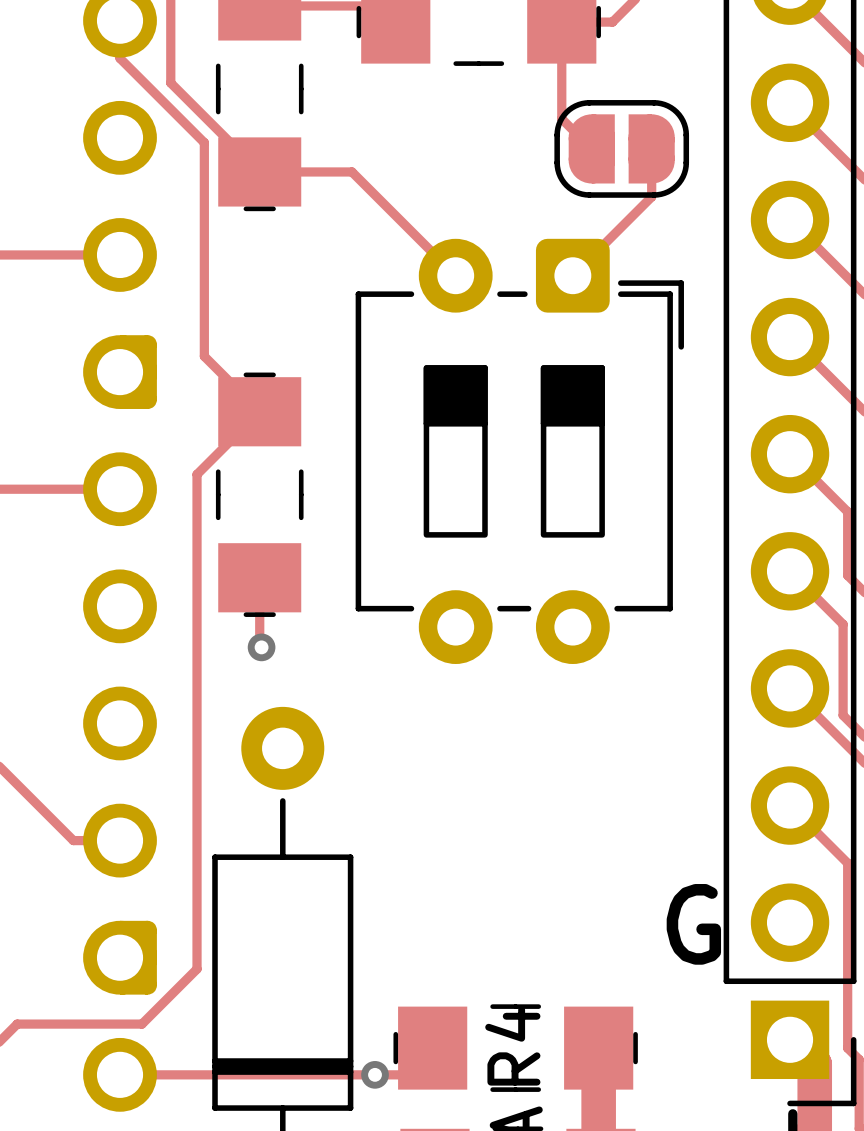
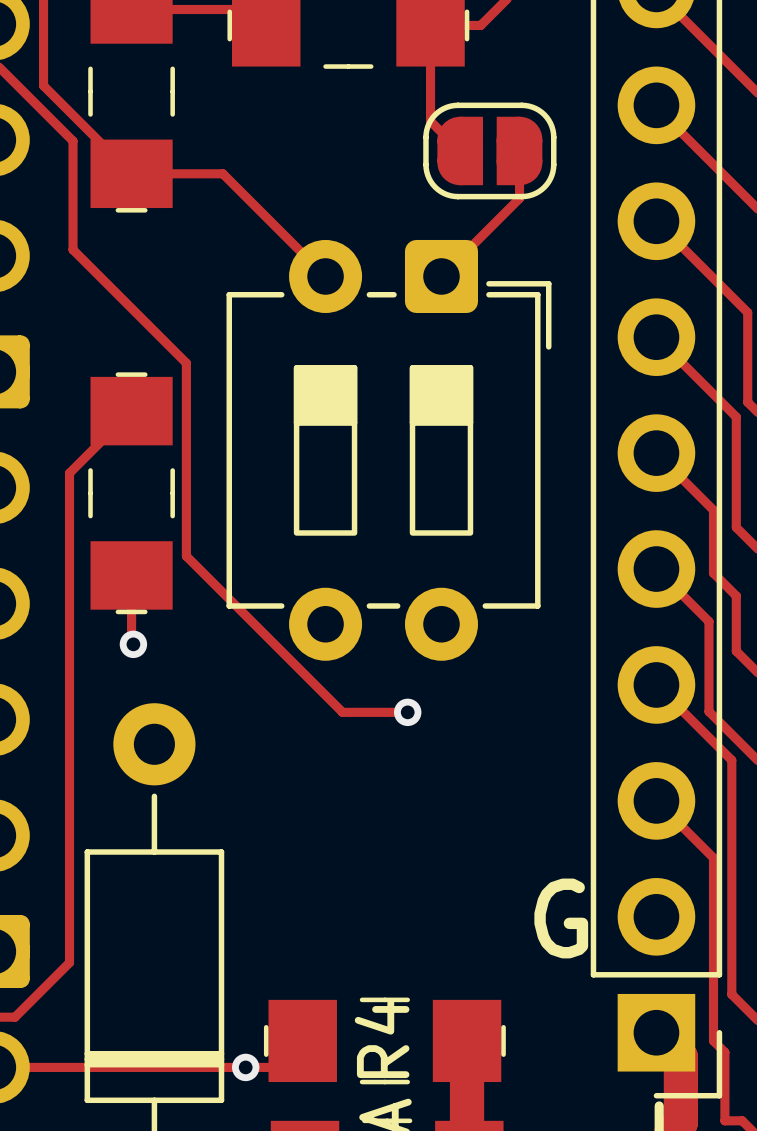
track: (200, 138) (204, 142) (204, 356) (255, 407) -> (73, 141) (73, 249) (186, 363) (186, 556) (342, 712) (407, 712)
via: none -> (407, 712)

